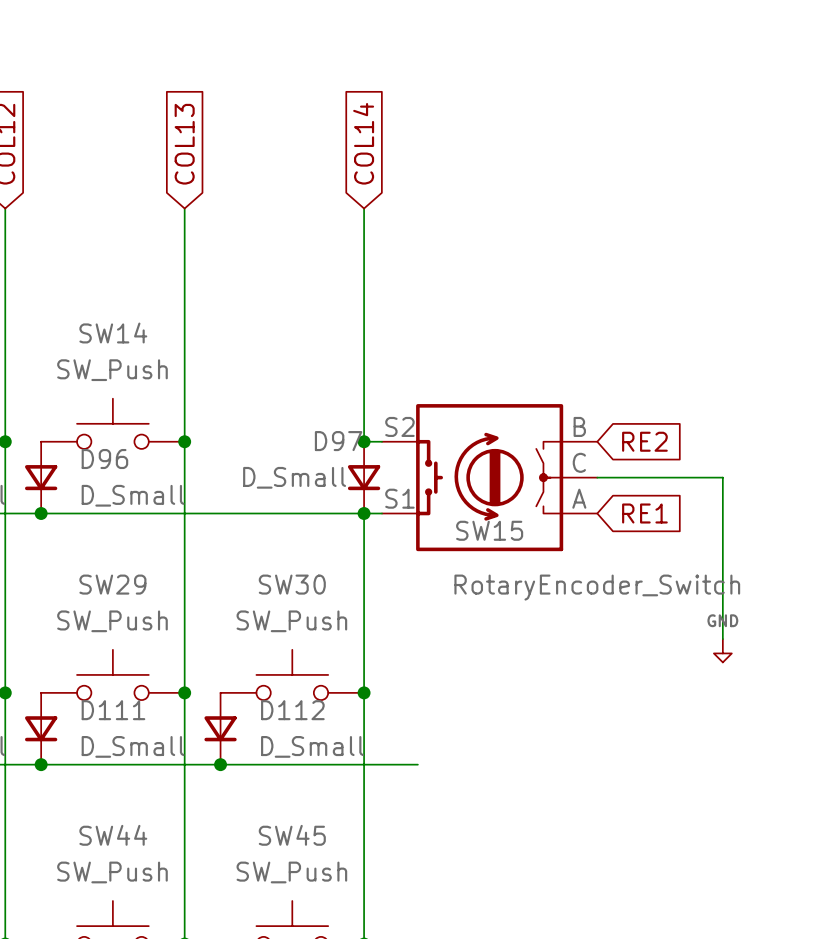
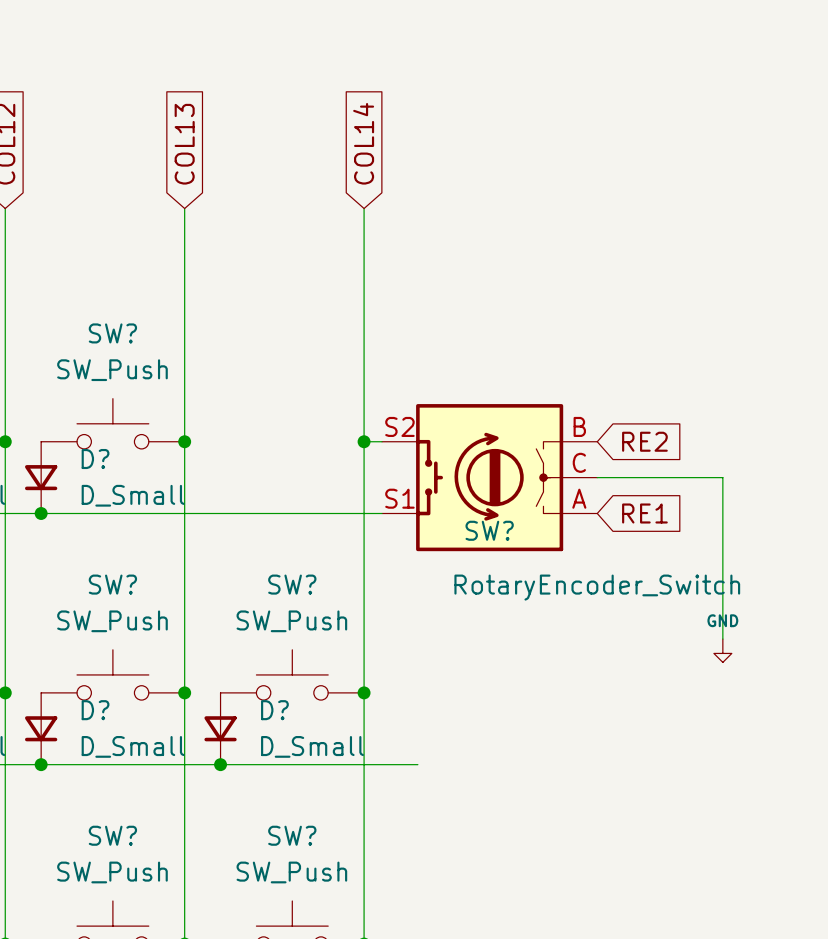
SW14 name: SW14 (113, 333) -> SW? (112, 333)
D96 name: D96 (104, 459) -> D? (95, 459)
D97: D_Small (364, 477) -> none
junction: (364, 513) -> none
SW15 name: SW15 (489, 530) -> SW? (489, 530)
SW29 name: SW29 (112, 584) -> SW? (112, 584)
SW30 name: SW30 (292, 584) -> SW? (292, 584)
D111 name: D111 (113, 710) -> D? (95, 710)
D112 name: D112 (292, 710) -> D? (274, 710)
SW44 name: SW44 (113, 835) -> SW? (112, 835)
SW45 name: SW45 (292, 835) -> SW? (292, 835)

